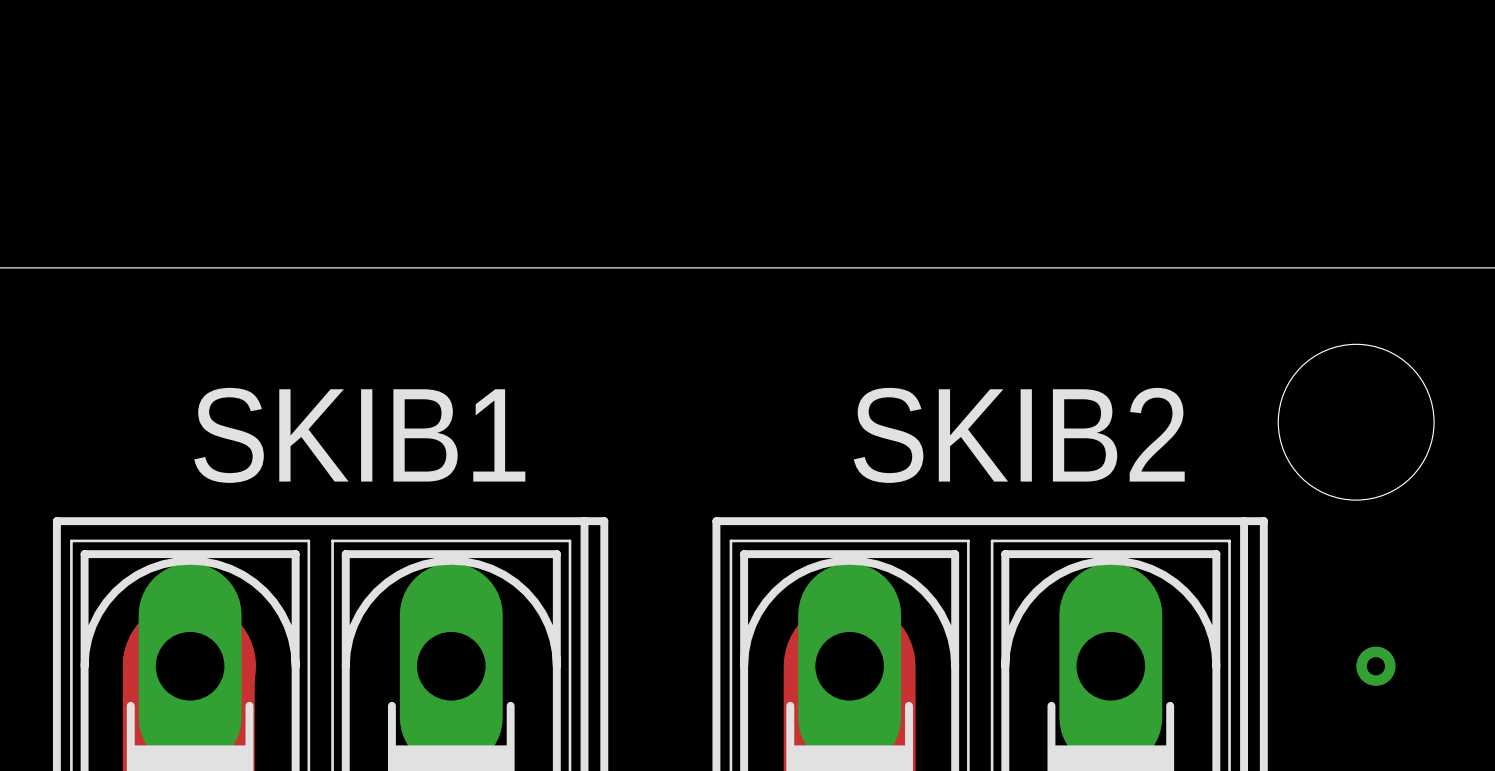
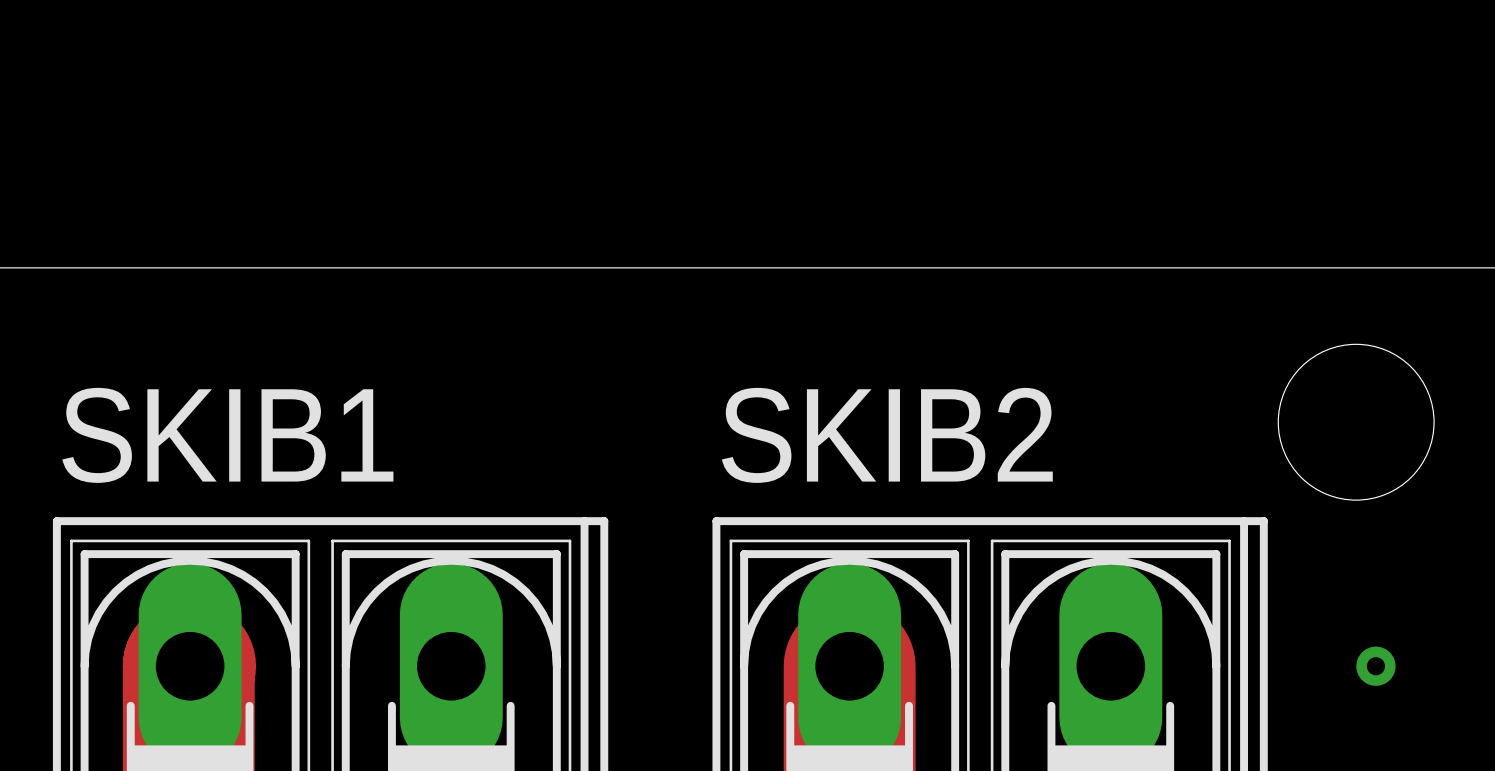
SKIB1 name position: SKIB1 (359, 435) -> SKIB1 (227, 435)
SKIB2 name position: SKIB2 (1019, 435) -> SKIB2 (887, 435)

